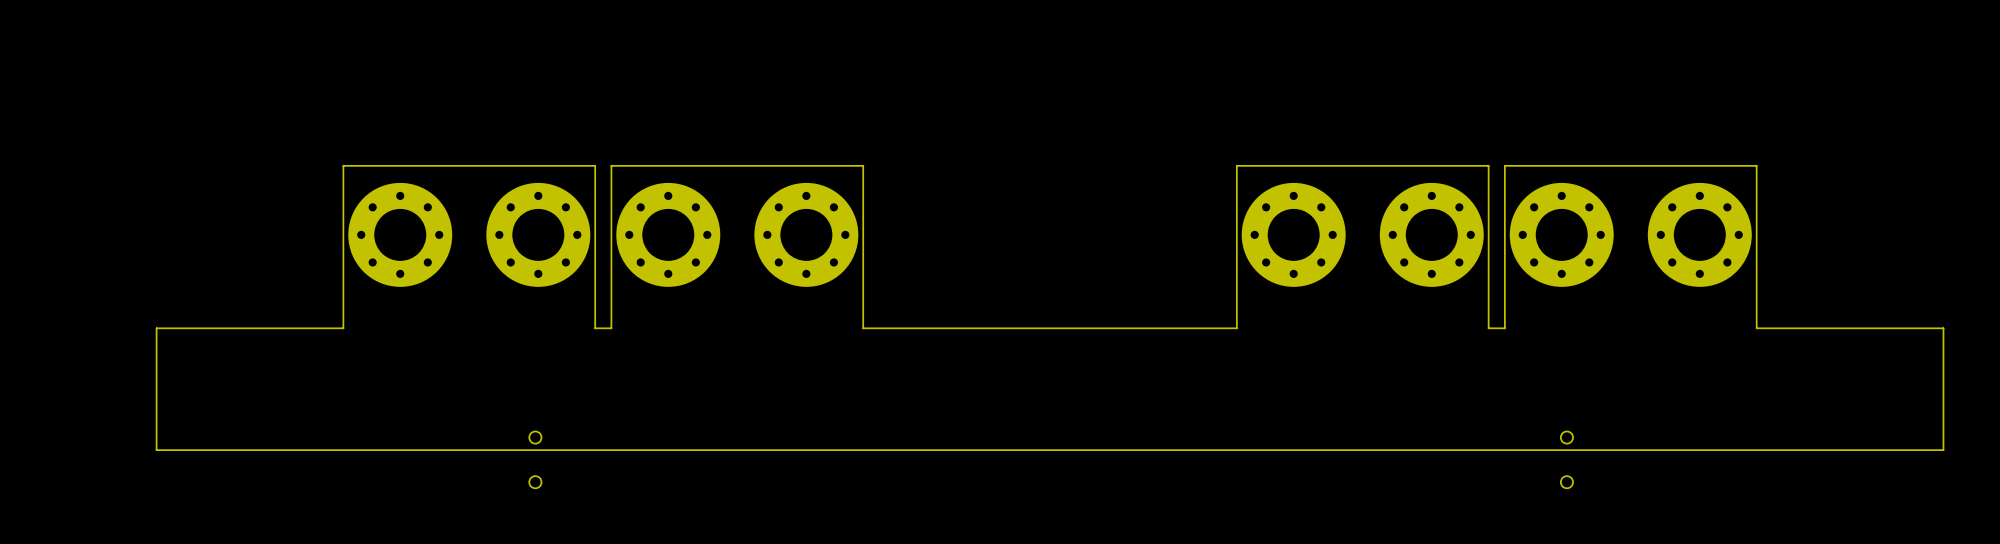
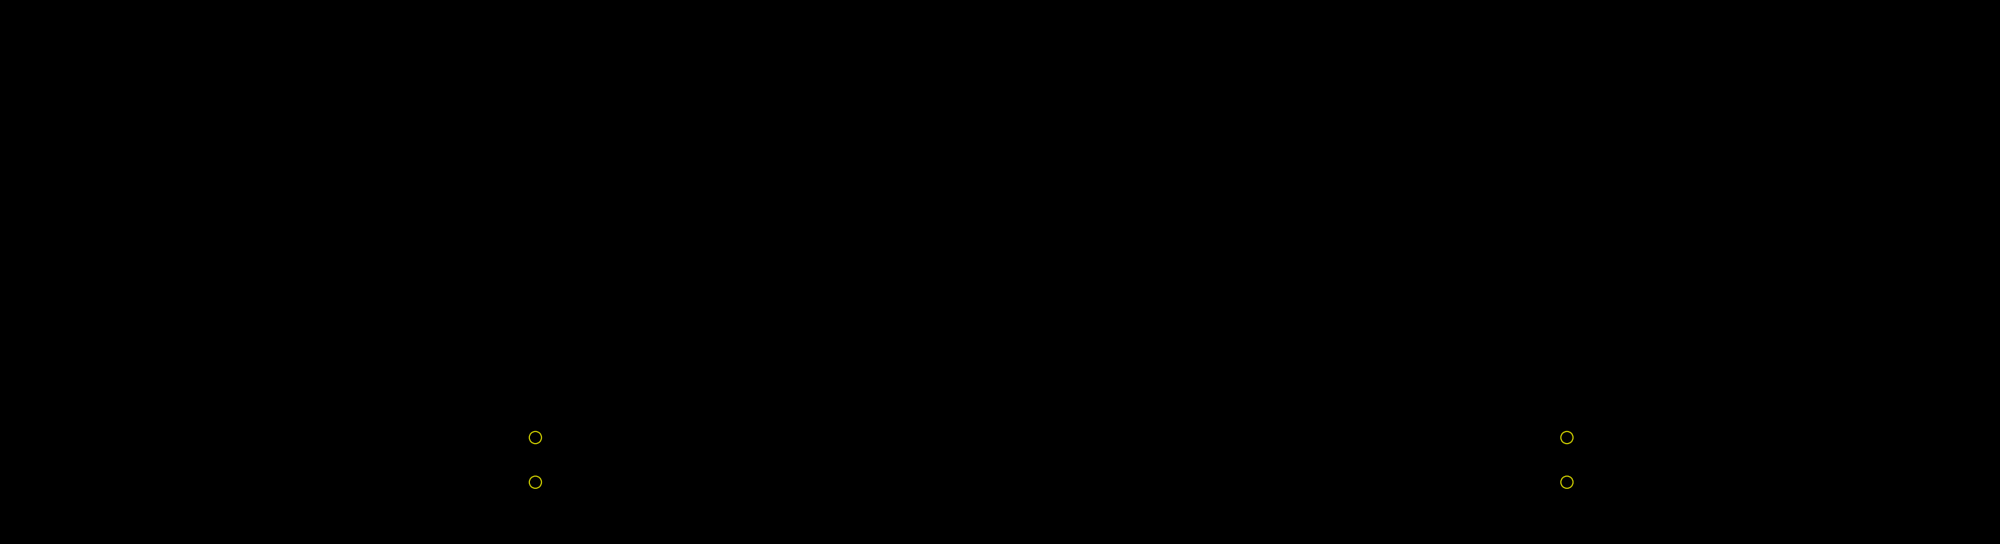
board edge: (1756, 165) (1504, 165) (1504, 328) (1488, 328) (1488, 165) (1236, 165) (1236, 328) (863, 328) (863, 165) (611, 165) (611, 328) (595, 328) (595, 165) (343, 165) (343, 328) (156, 328) (156, 450) (1943, 450) (1943, 328) (1756, 328) (1756, 165) -> none
part: (400, 234) -> none
part: (538, 234) -> none
part: (668, 234) -> none
part: (806, 234) -> none
part: (1293, 234) -> none
part: (1431, 234) -> none
part: (1561, 234) -> none
part: (1699, 234) -> none

